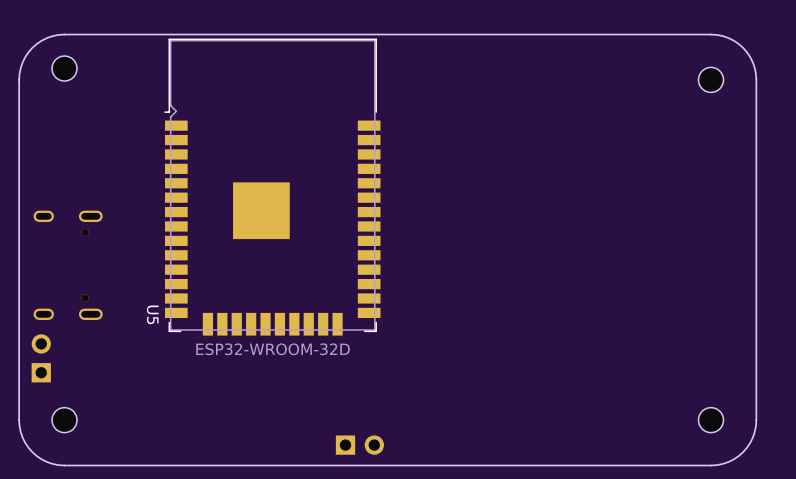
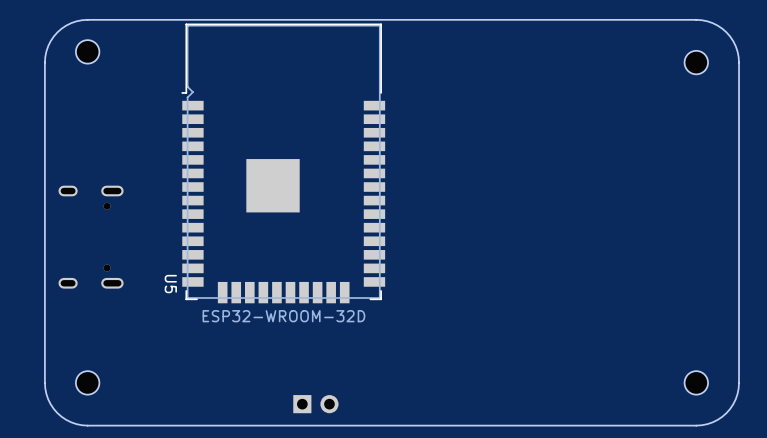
part: (41, 358) -> none
part position: (359, 445) -> (315, 404)

